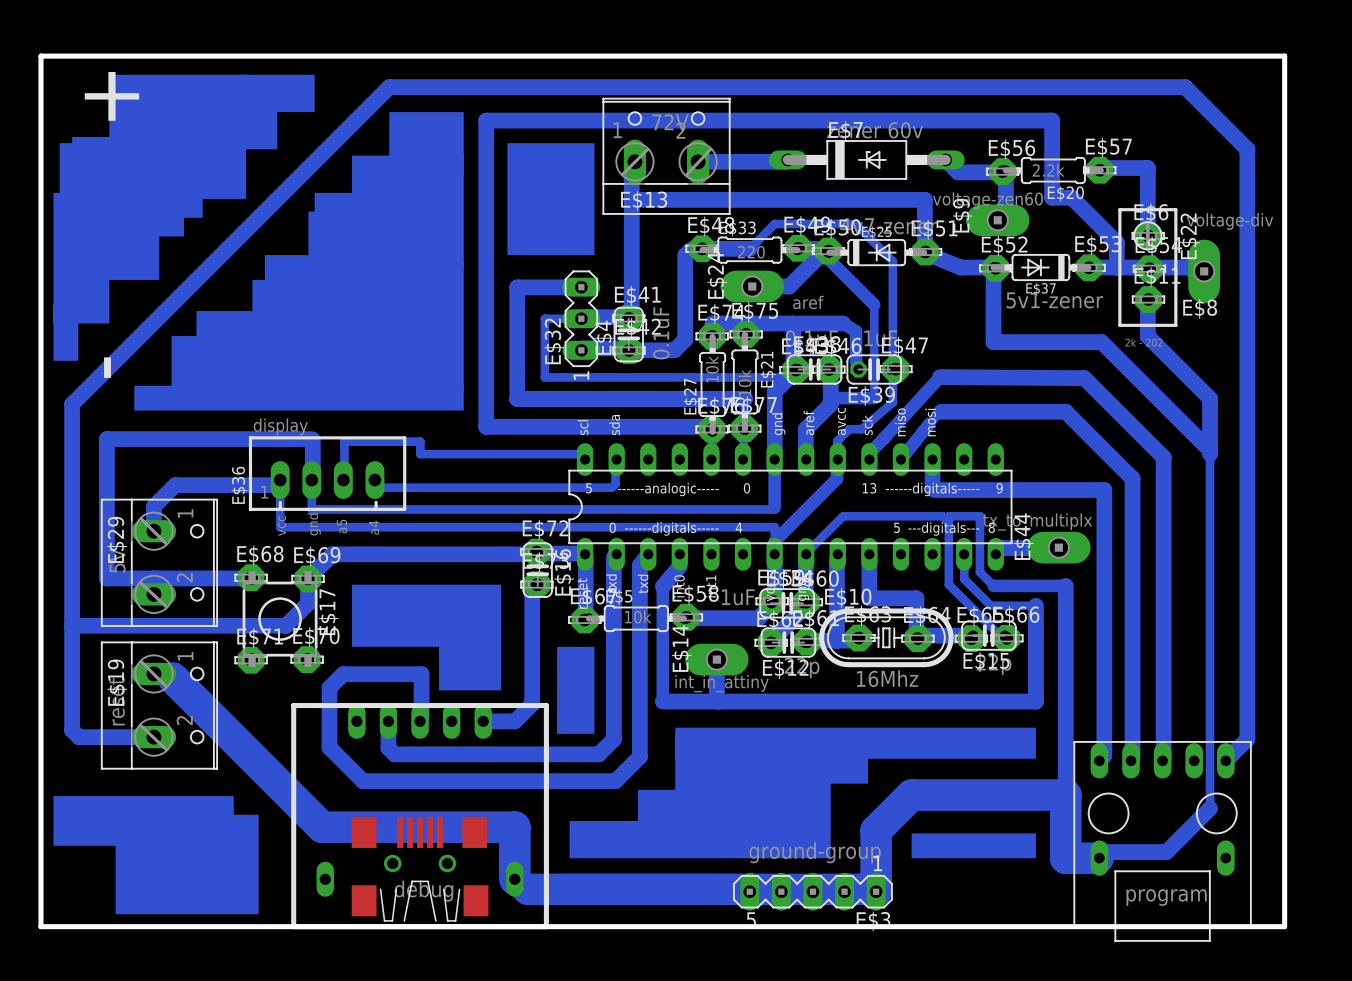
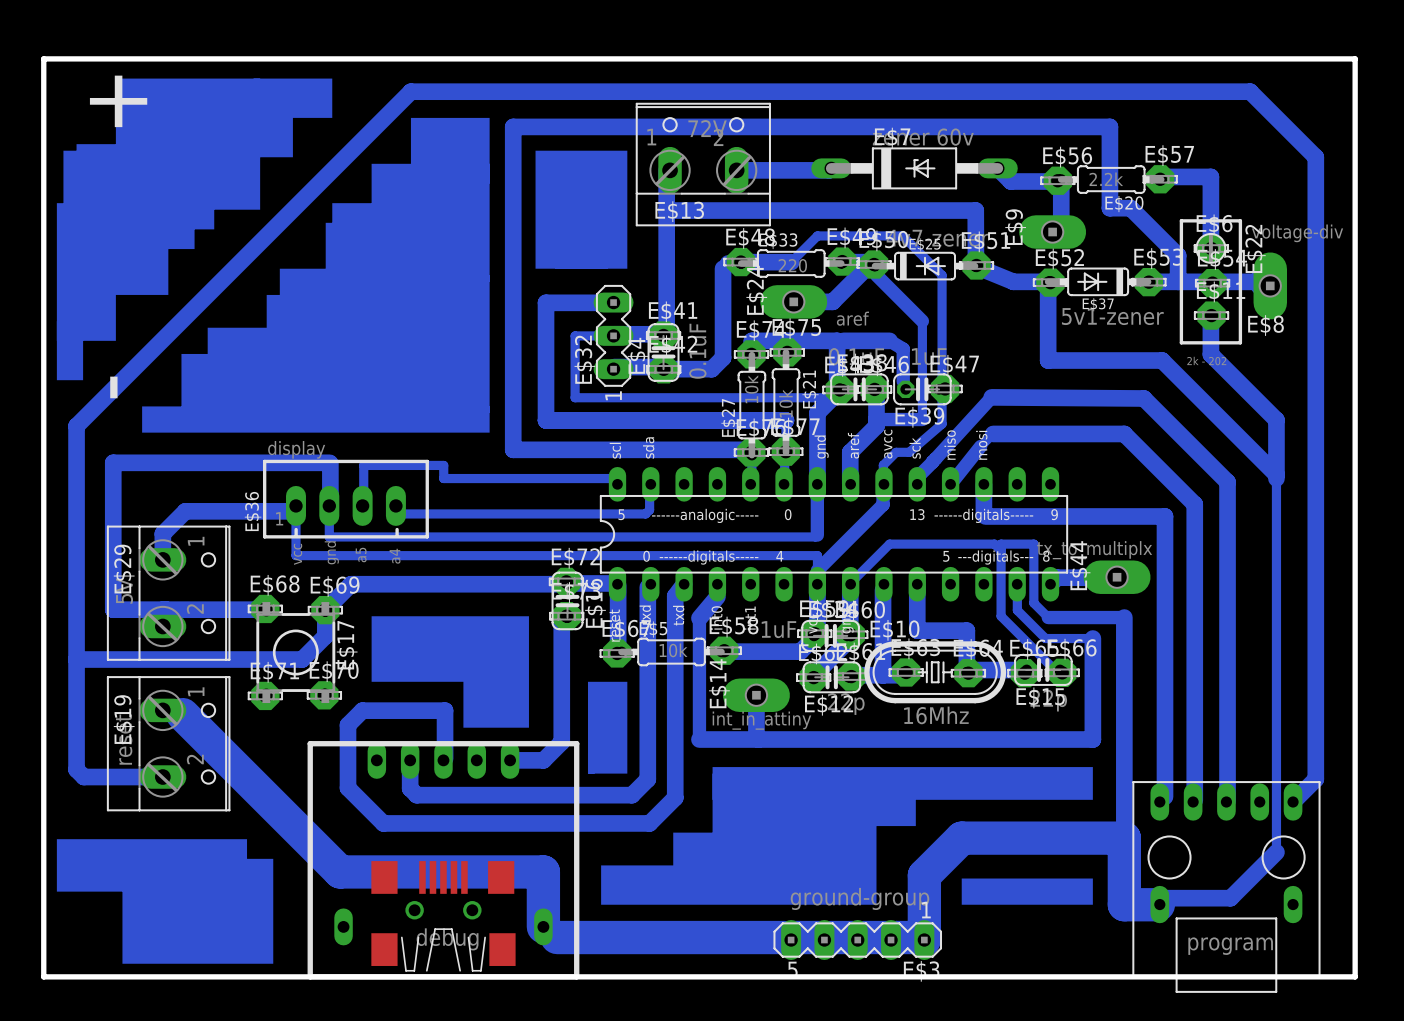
E$9 text: voltage-zen60 (987, 200) -> none

